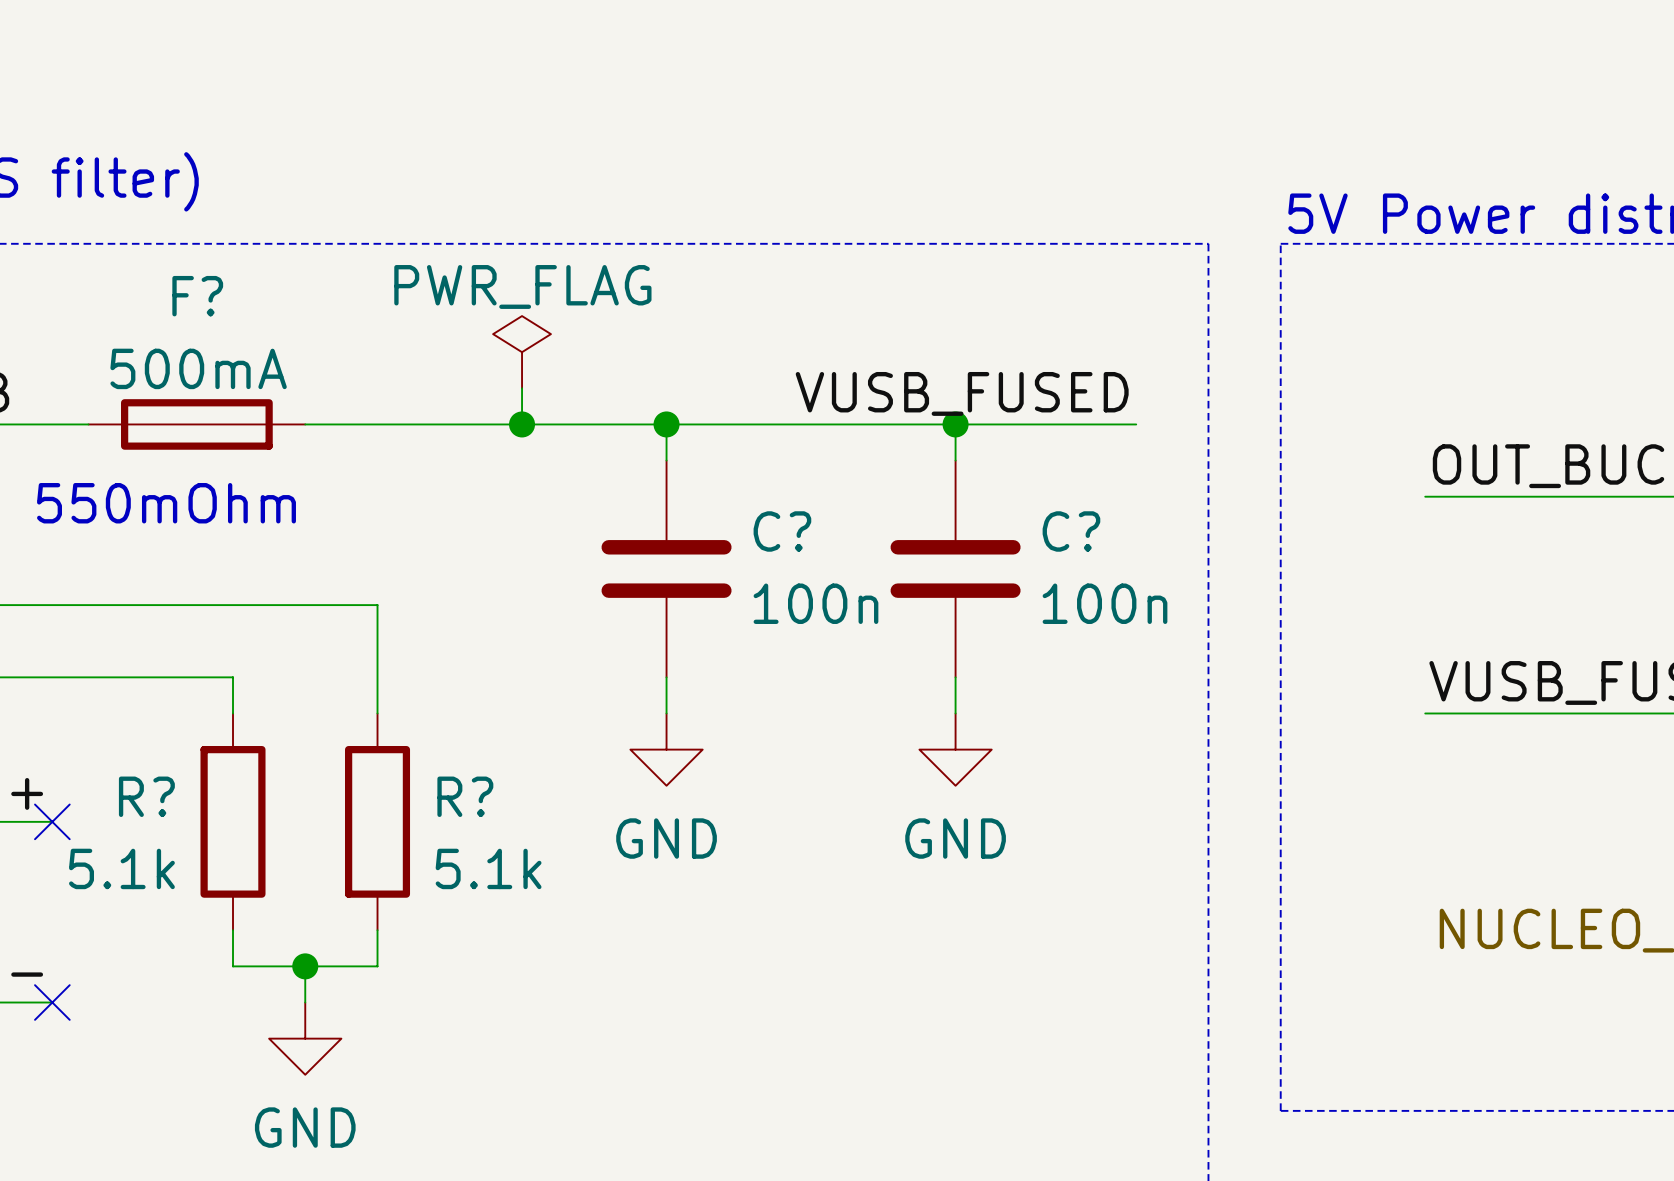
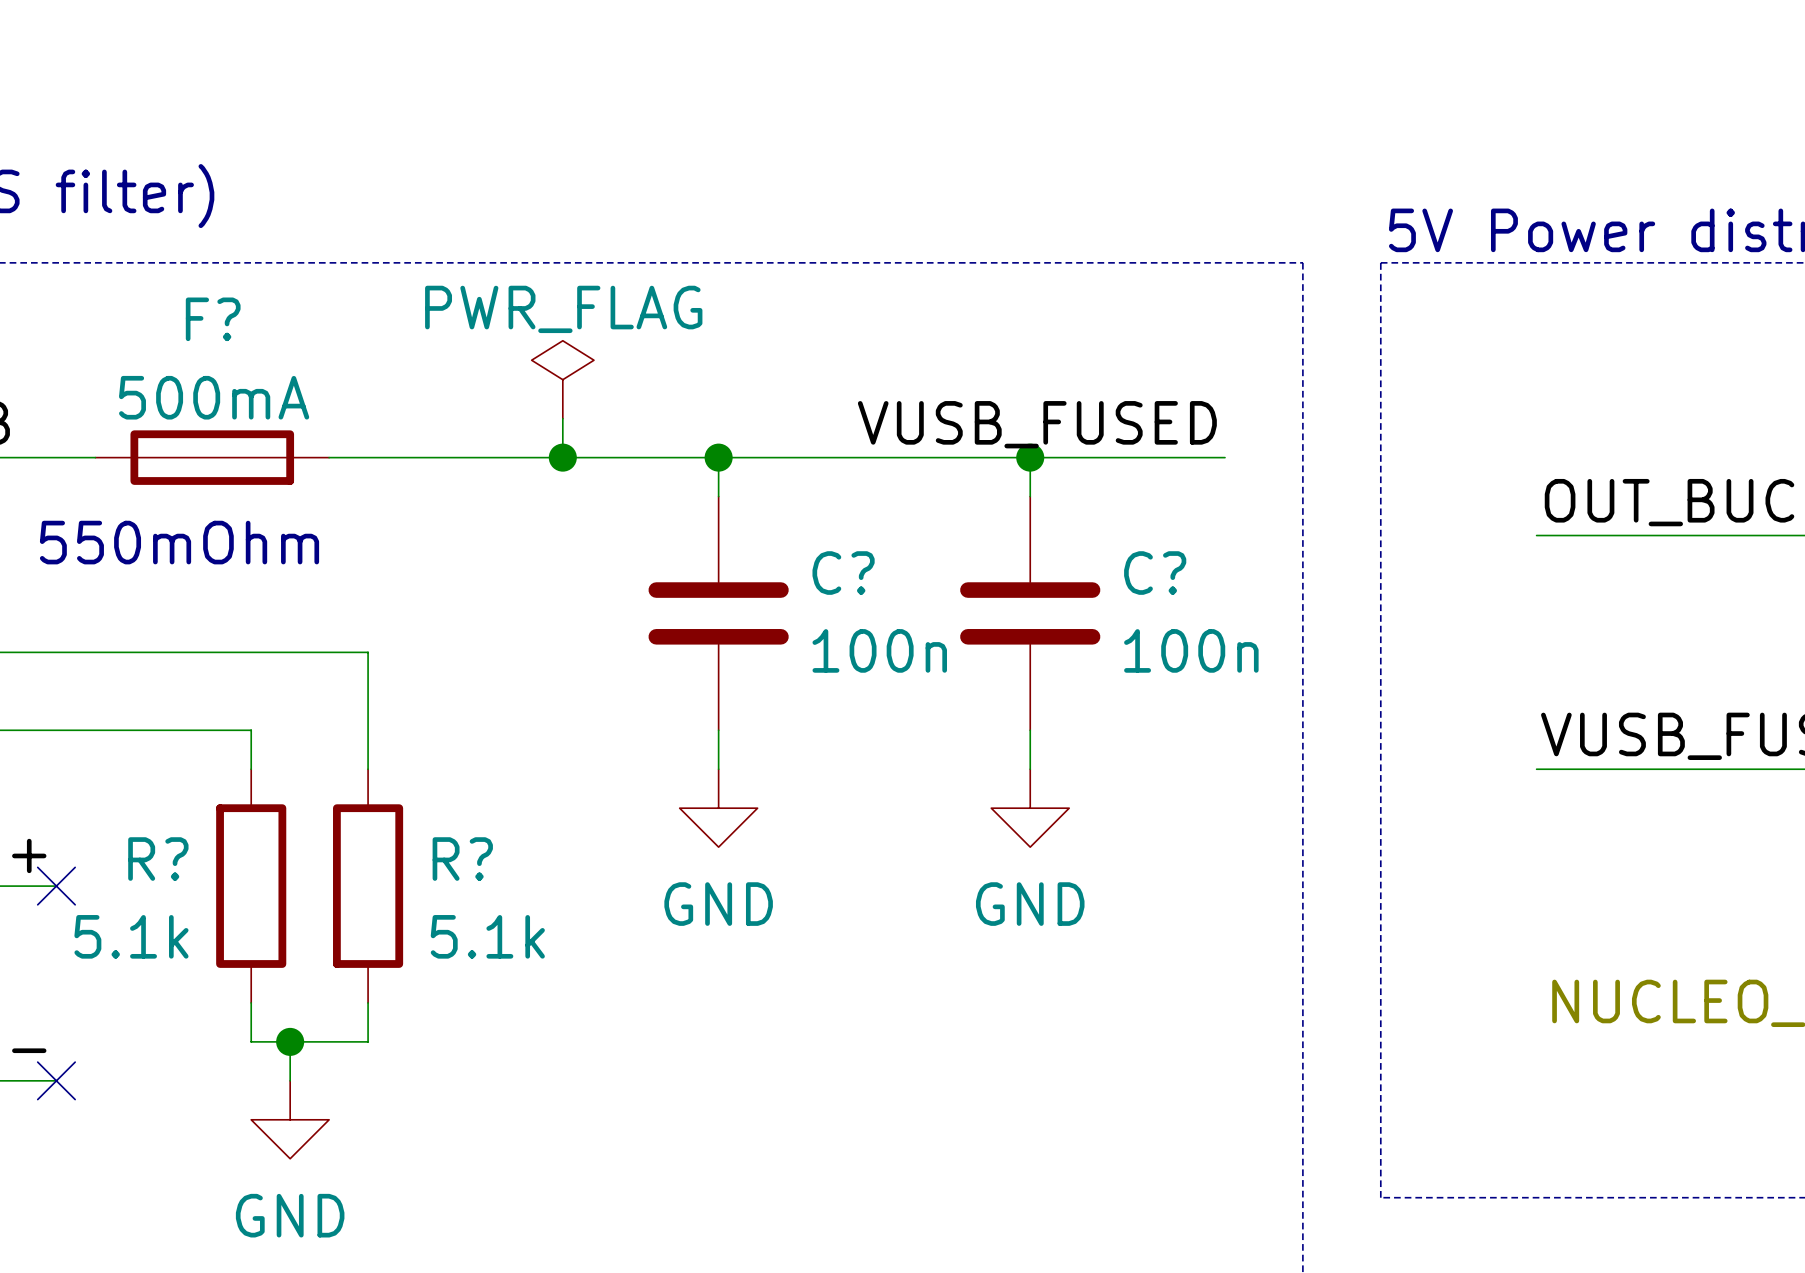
wire: (341, 605) (377, 605) (377, 713) -> (368, 652) (368, 769)
R? position: (377, 821) -> (368, 886)
wire: (377, 930) (377, 966) (341, 966) -> (368, 1002) (368, 1041)
wire: (305, 966) (305, 1002) -> (290, 1041) (290, 1080)
junction position: (305, 966) -> (290, 1041)
power symbol position: GND (305, 1038) -> GND (290, 1119)

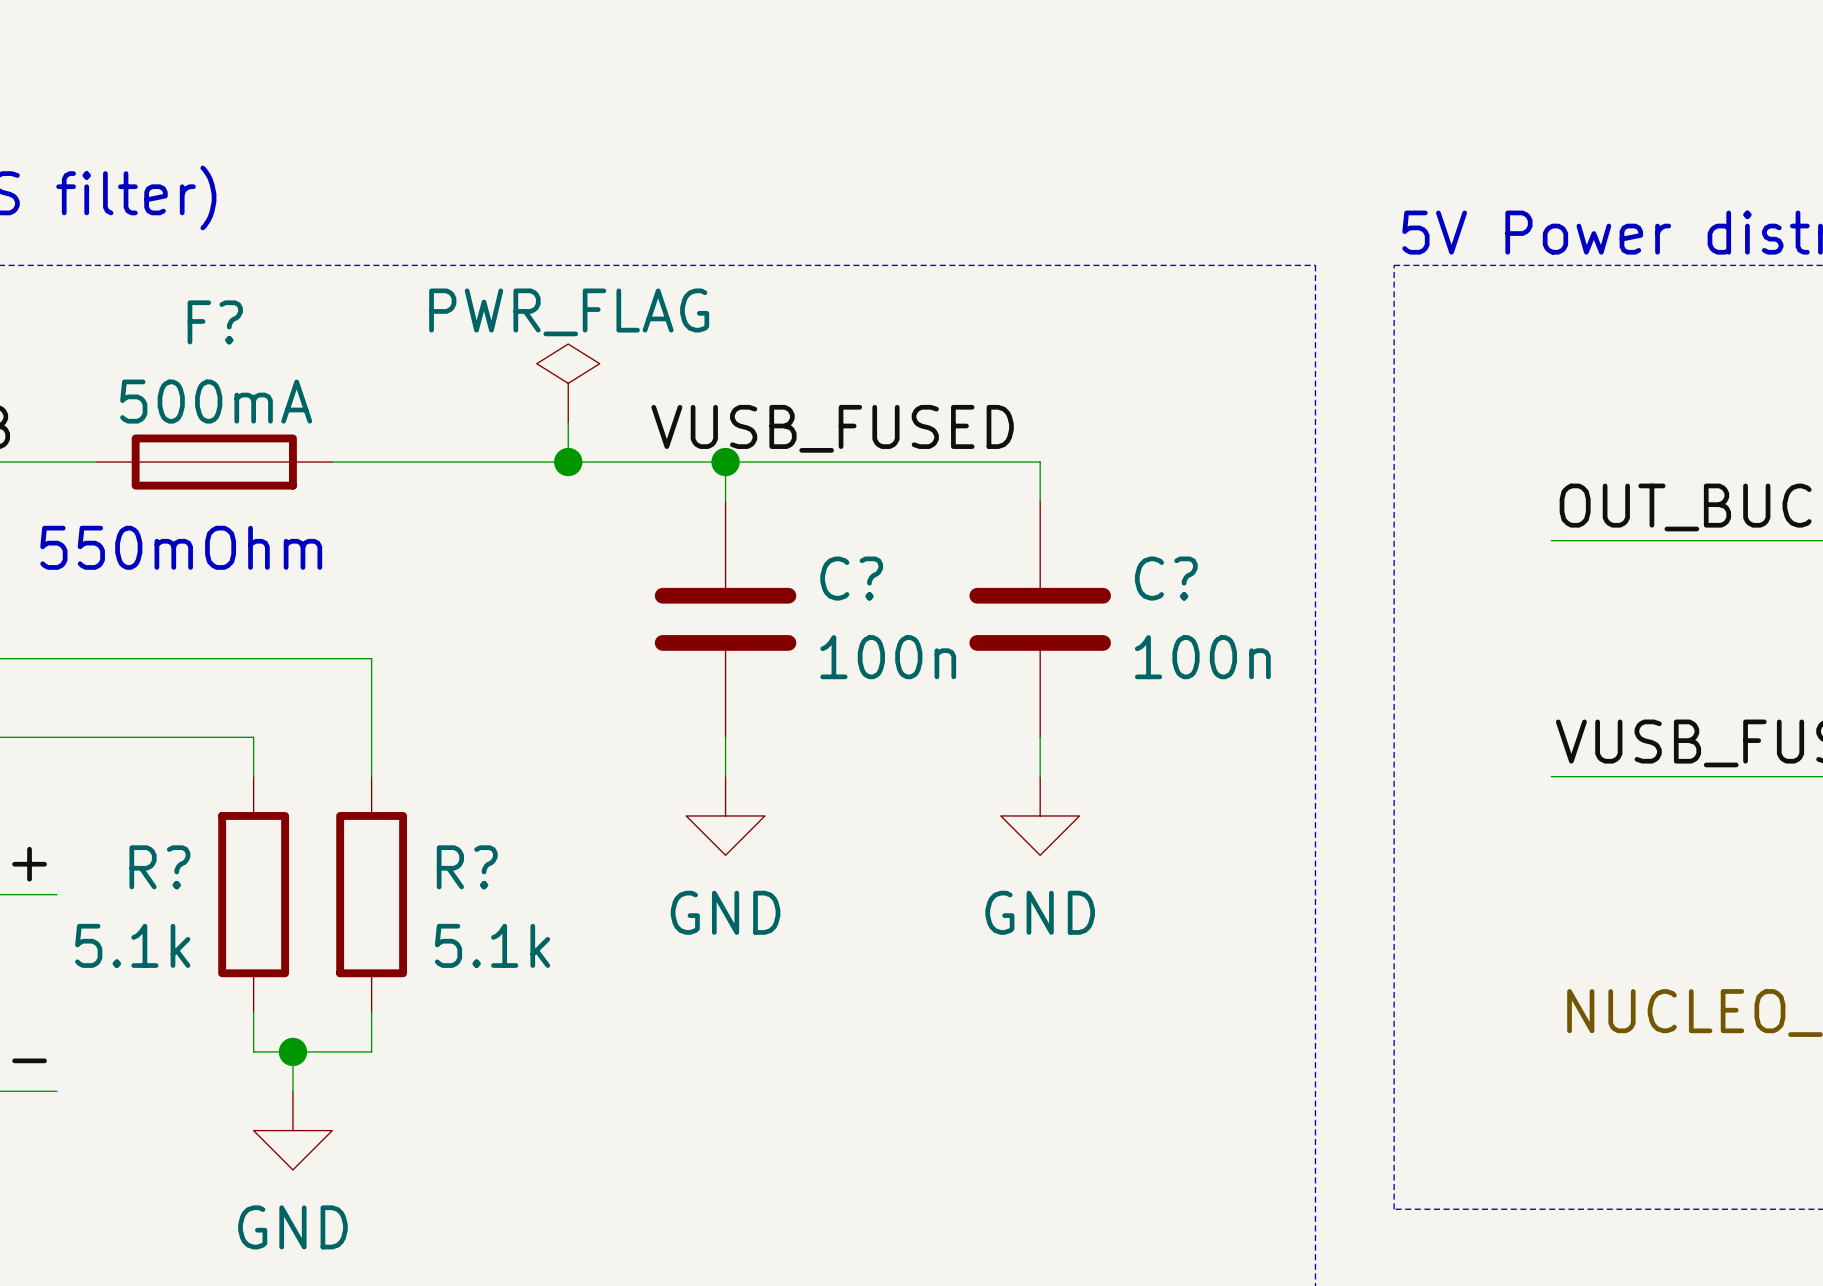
label position: VUSB_FUSED (1037, 424) -> VUSB_FUSED (832, 428)
wire: (1030, 457) (1225, 457) -> none
junction: (1030, 457) -> none
no-connect mark: (56, 886) -> none
no-connect mark: (56, 1080) -> none

